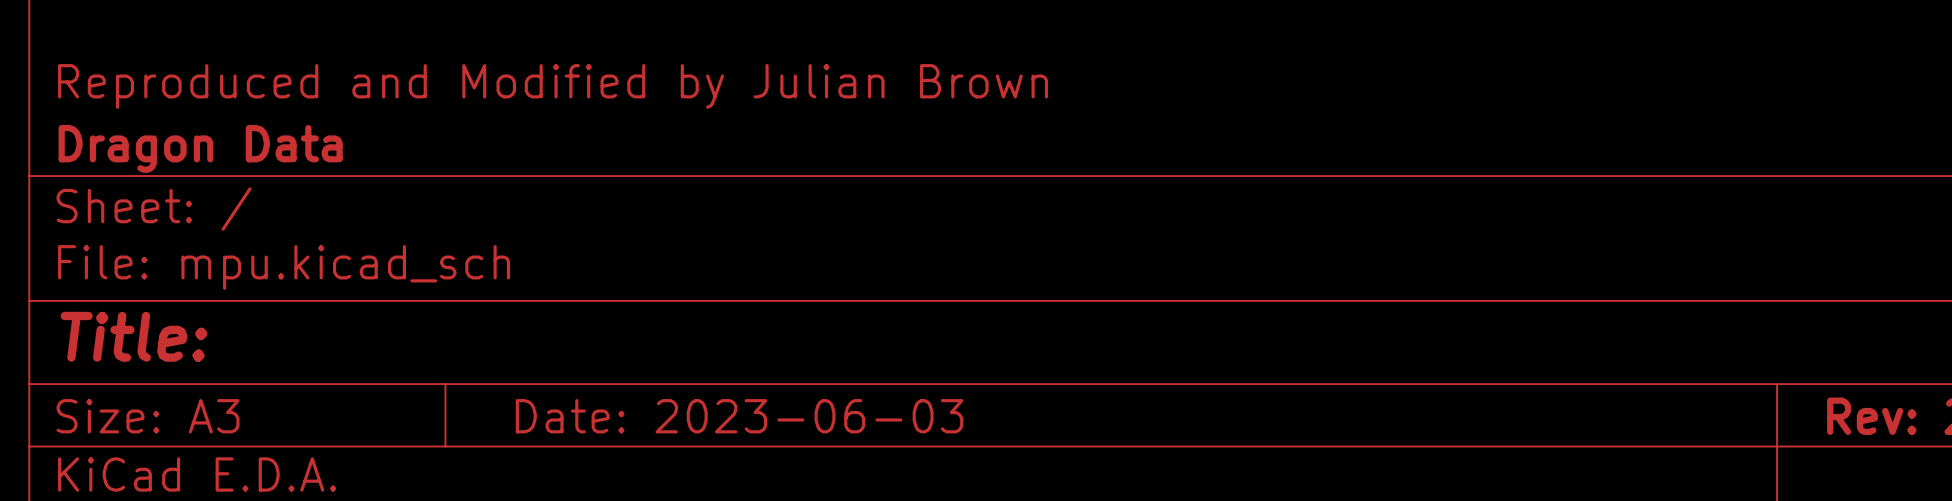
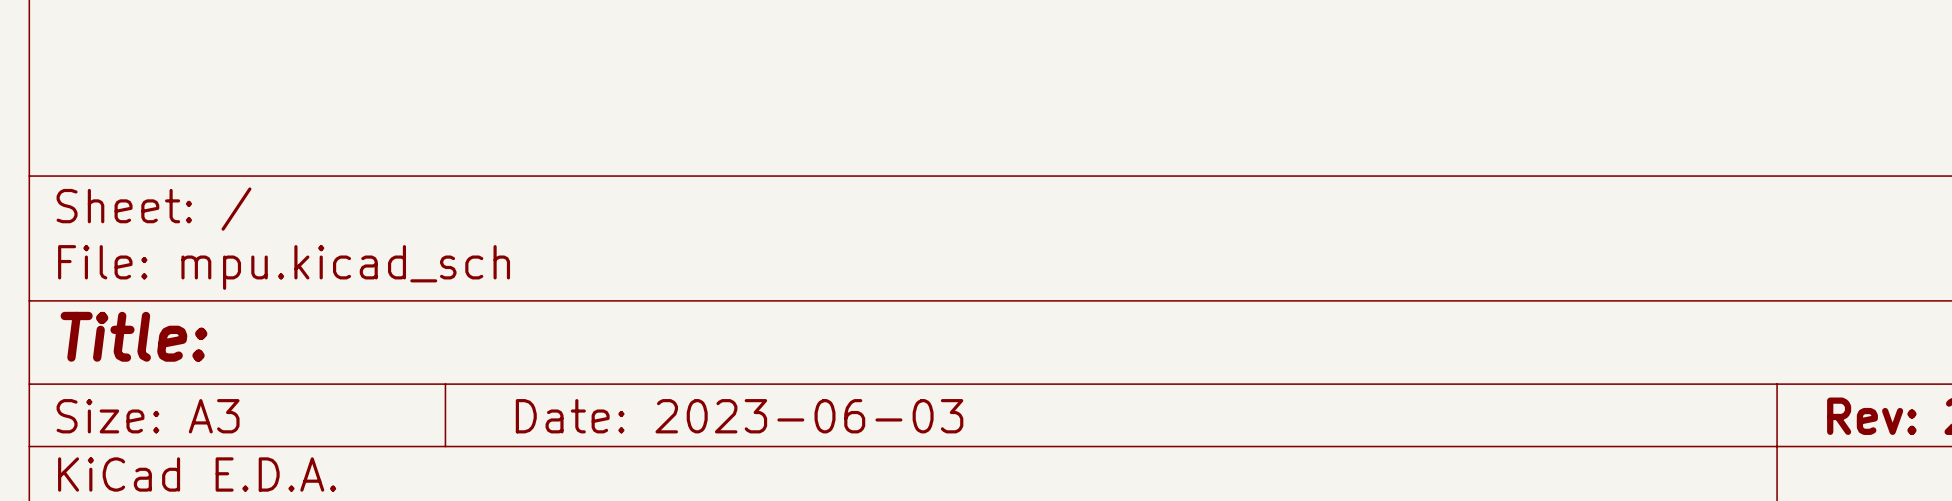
title block: Reproduced and Modified by Julian Brown (553, 86) -> none
title block: Dragon Data (200, 148) -> none

